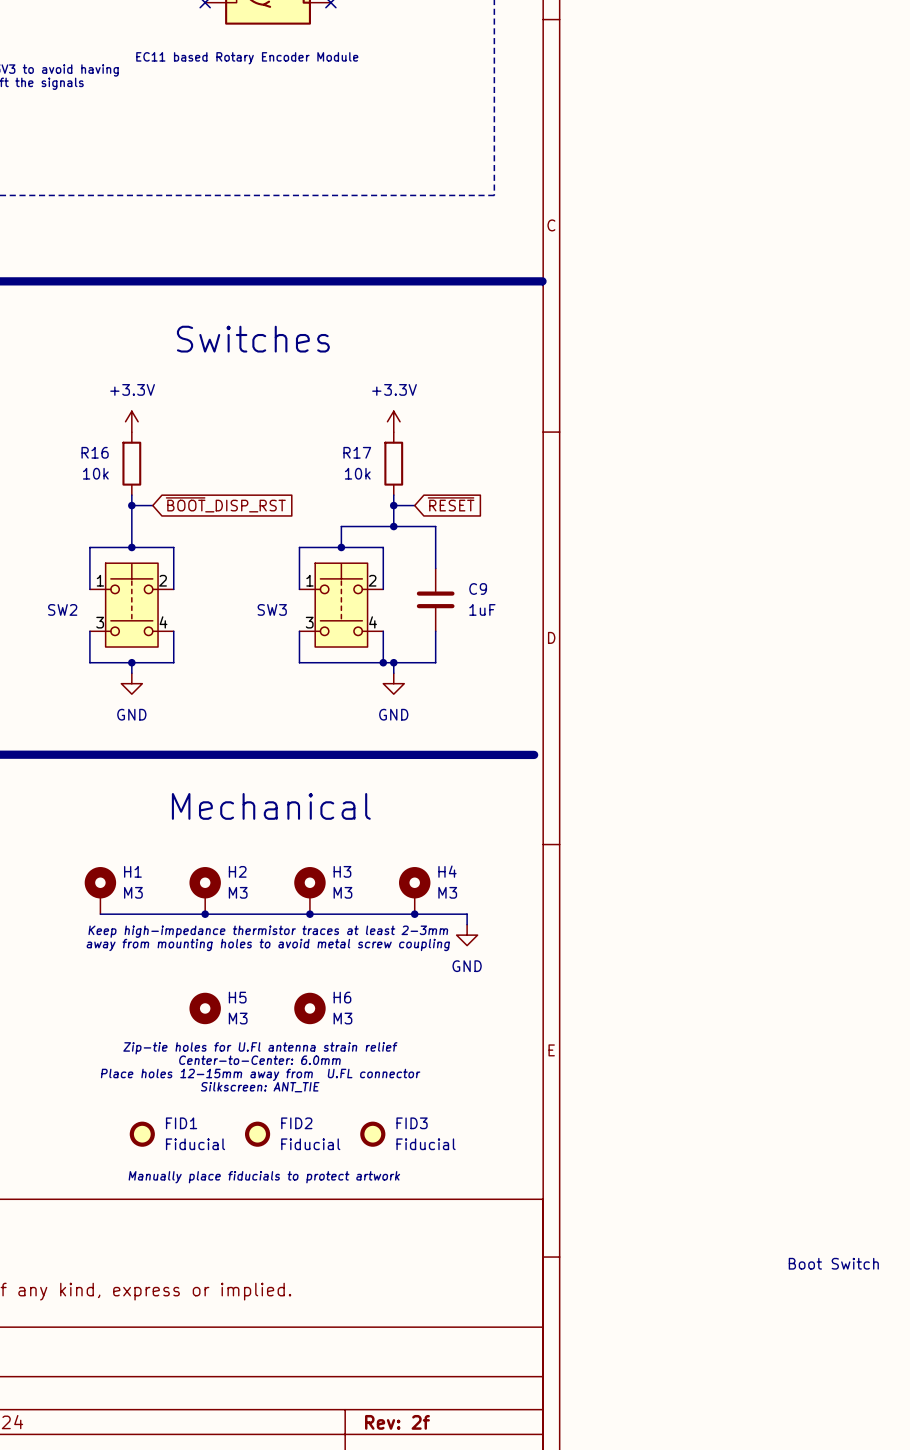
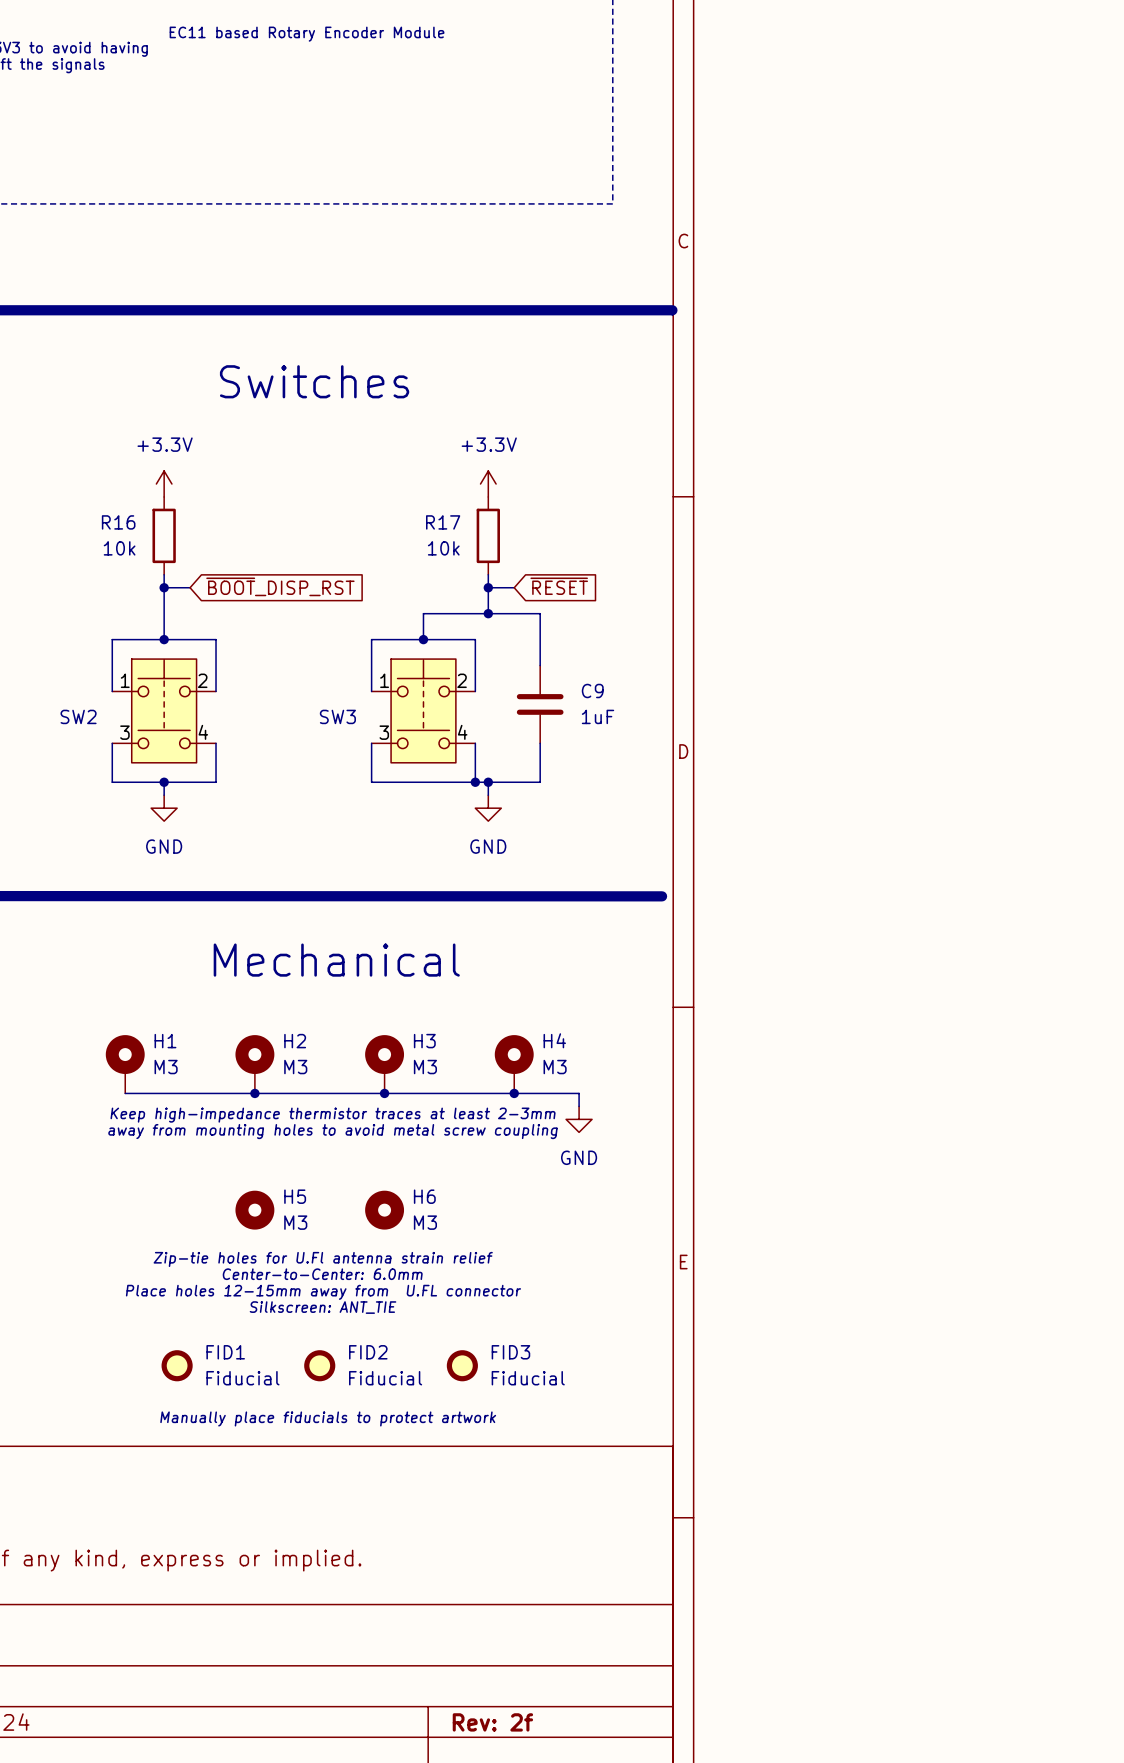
text: Boot Switch (833, 1263) -> none

